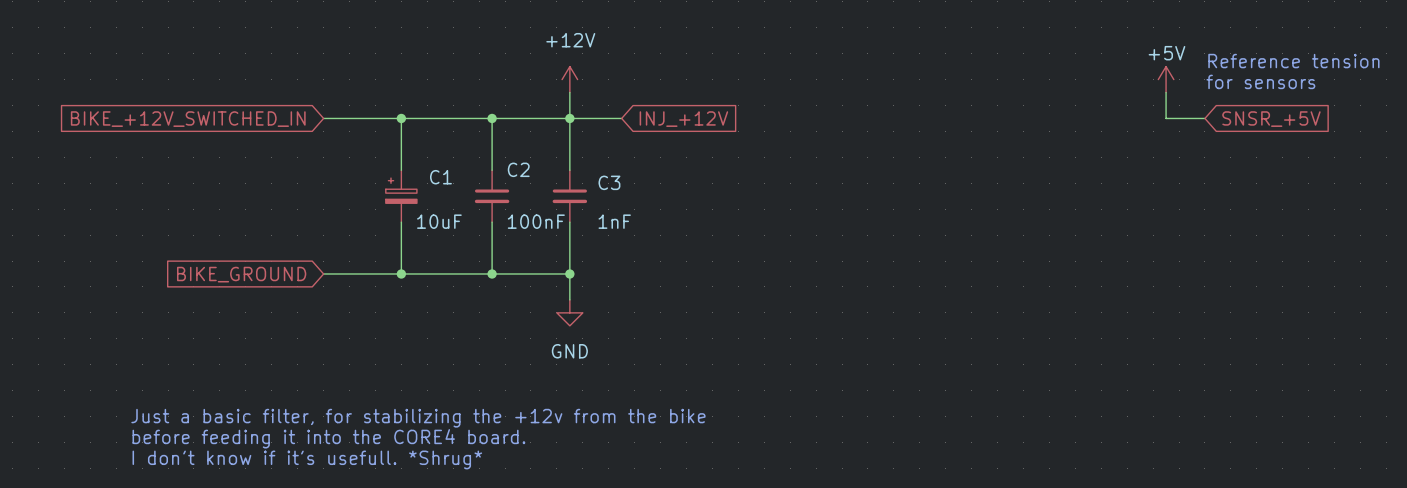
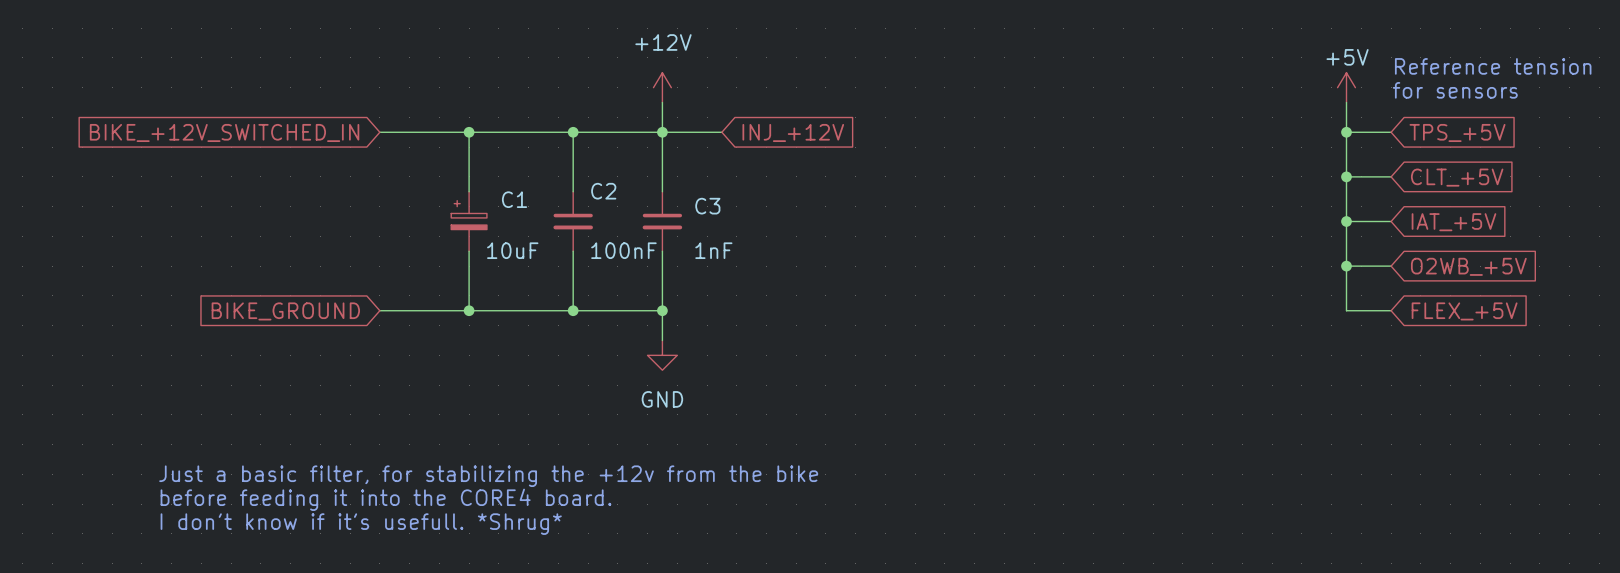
wire: none -> (1346, 132) (1346, 310) (1391, 310)
junction: none -> (1346, 132)
global label: SNSR_+5V (1271, 119) -> TPS_+5V (1457, 132)
wire: none -> (1346, 176) (1391, 176)
junction: none -> (1346, 176)
global label: none -> CLT_+5V (1457, 177)
wire: none -> (1346, 221) (1391, 221)
junction: none -> (1346, 221)
global label: none -> IAT_+5V (1453, 222)
wire: none -> (1346, 266) (1391, 266)
junction: none -> (1346, 266)
global label: none -> O2WB_+5V (1468, 266)
global label: none -> FLEX_+5V (1464, 311)

